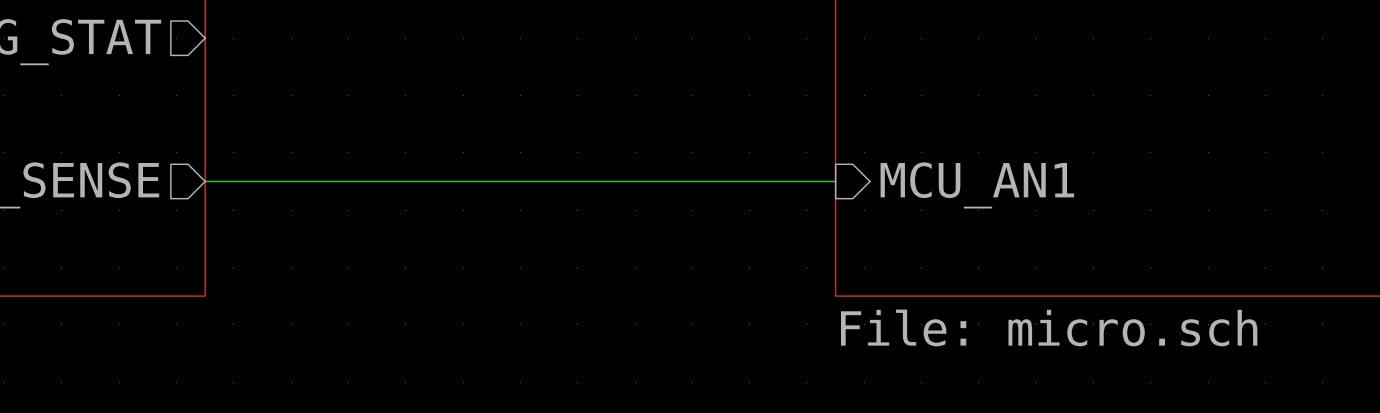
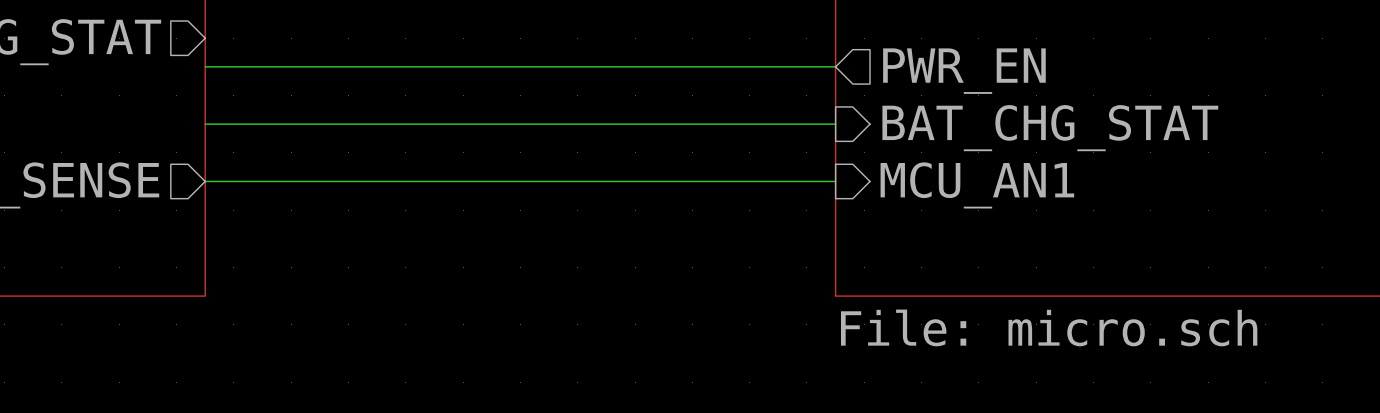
wire: none -> (205, 66) (835, 66)
sheet pin: none -> PWR_EN (964, 71)
wire: none -> (205, 124) (835, 124)
sheet pin: none -> BAT_CHG_STAT (1050, 128)

